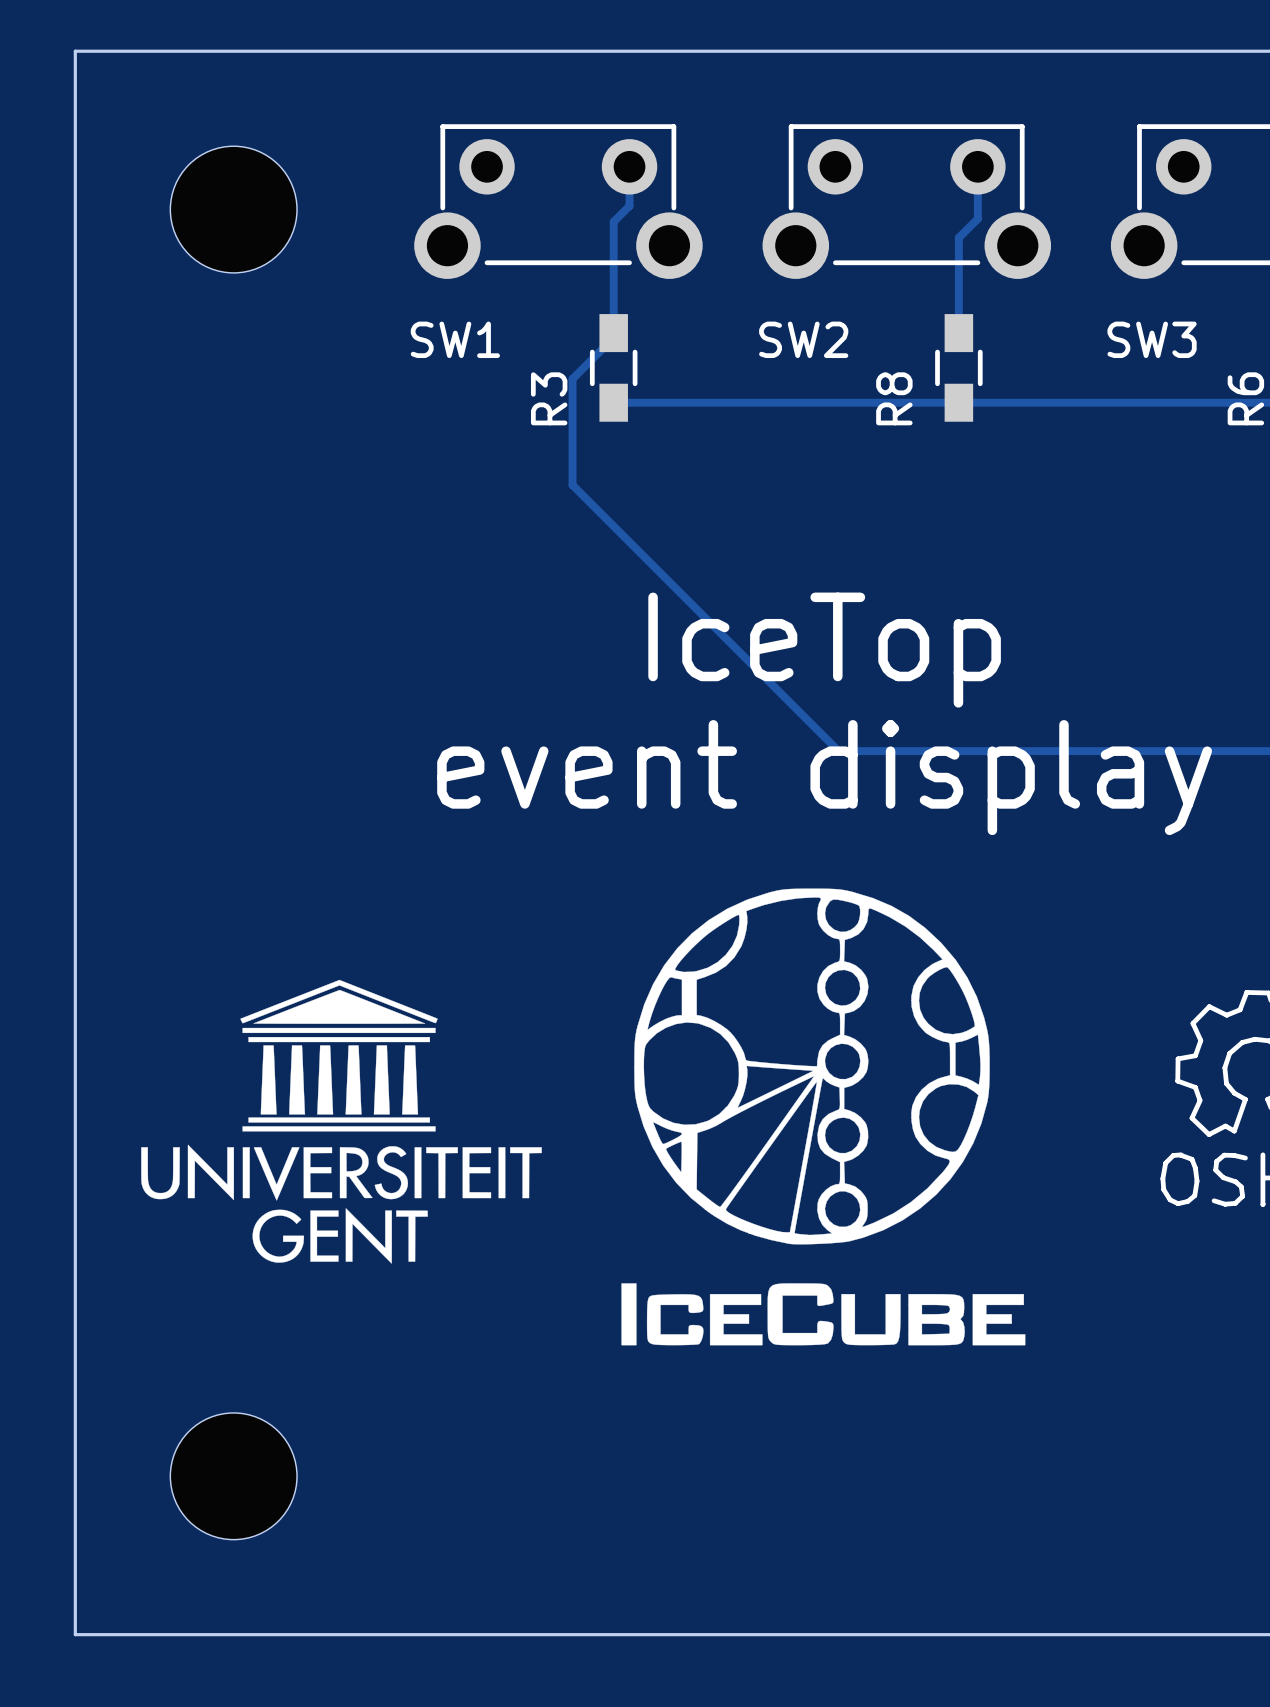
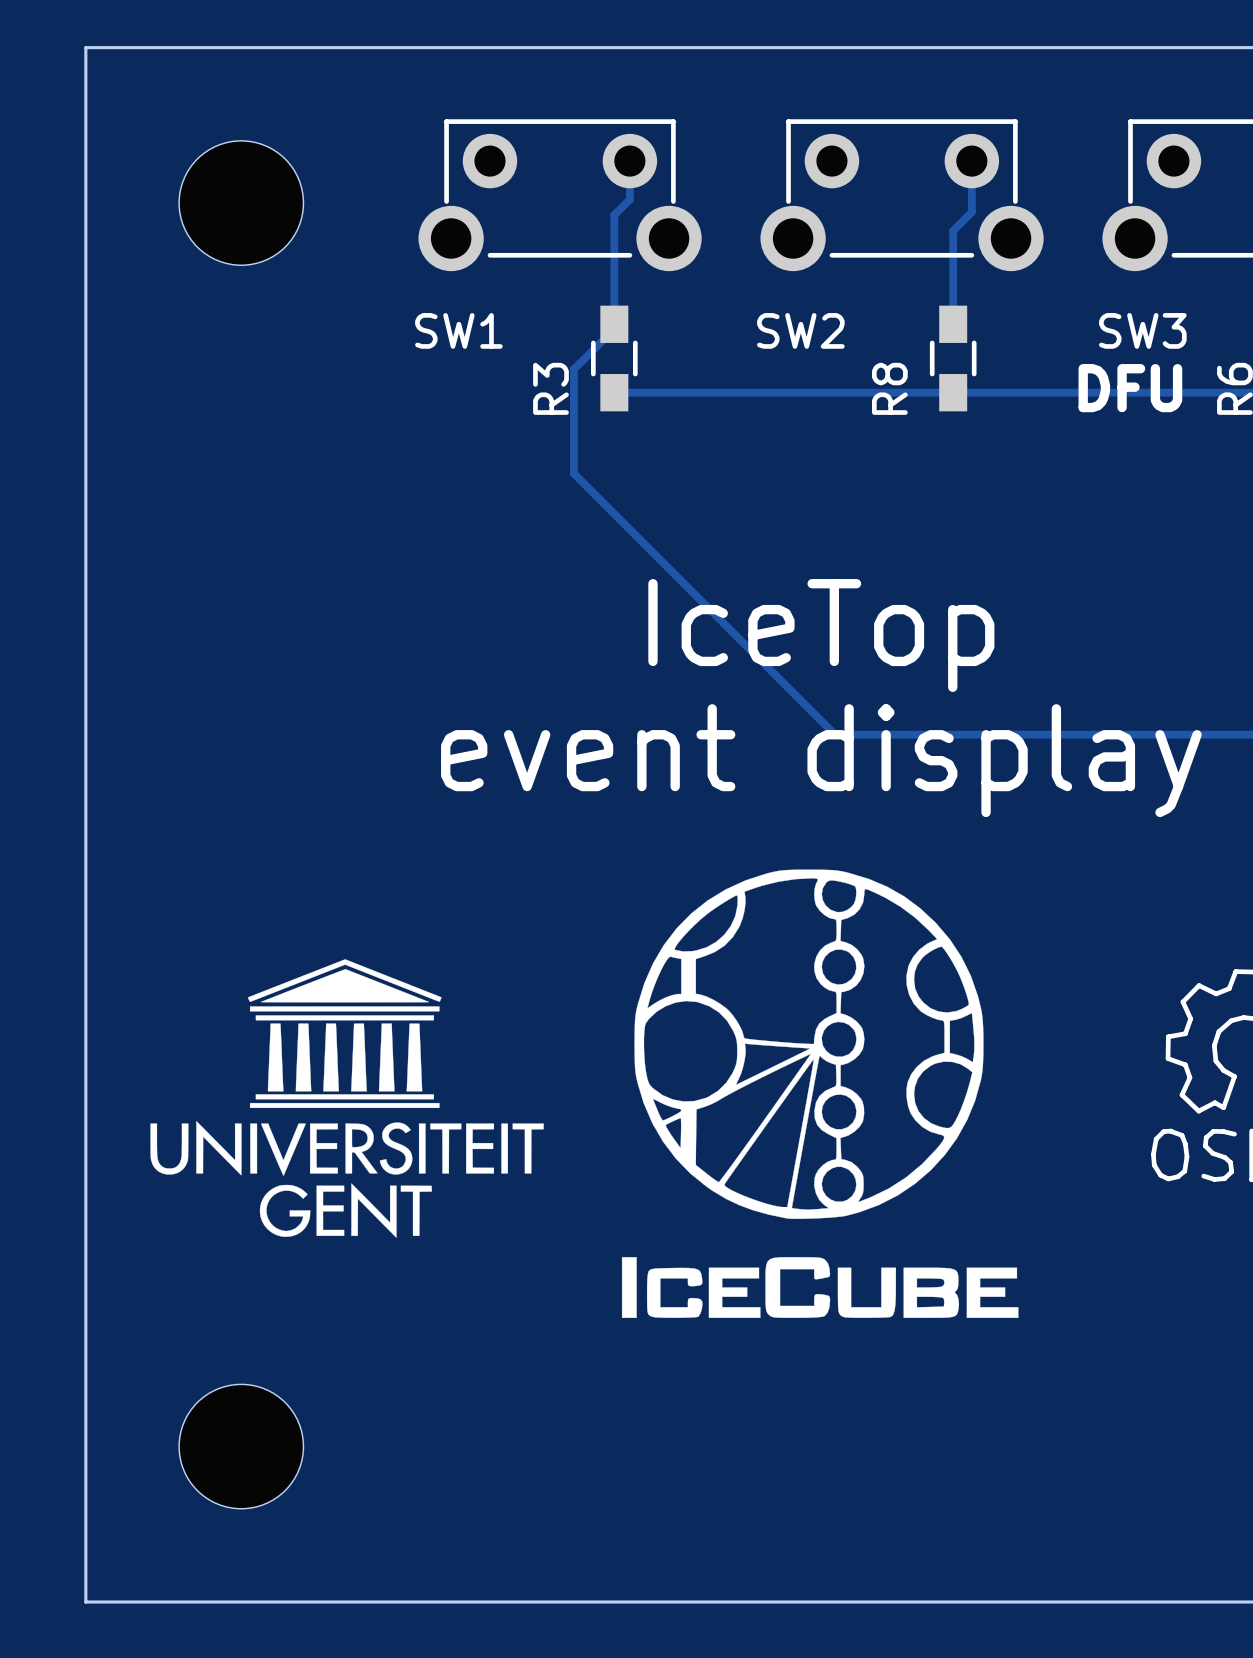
text: none -> DFU (1130, 388)

